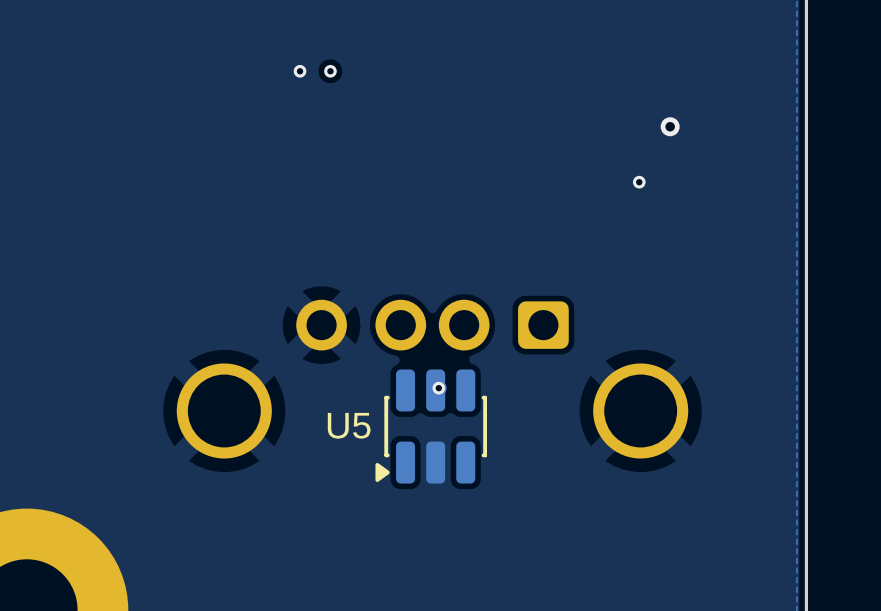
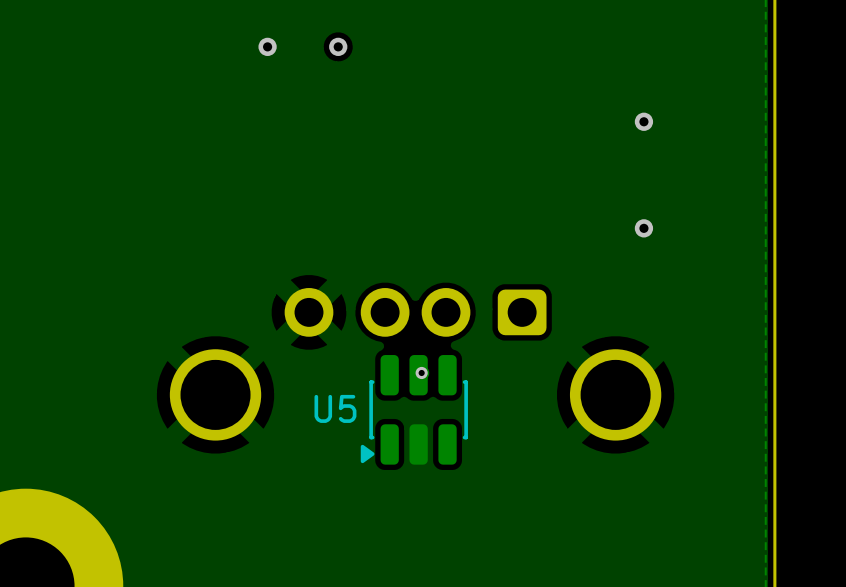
via: none -> (267, 46)
via: none -> (338, 46)
via: (300, 71) -> none
via: (330, 71) -> none
via: (639, 182) -> none
via: none -> (643, 228)

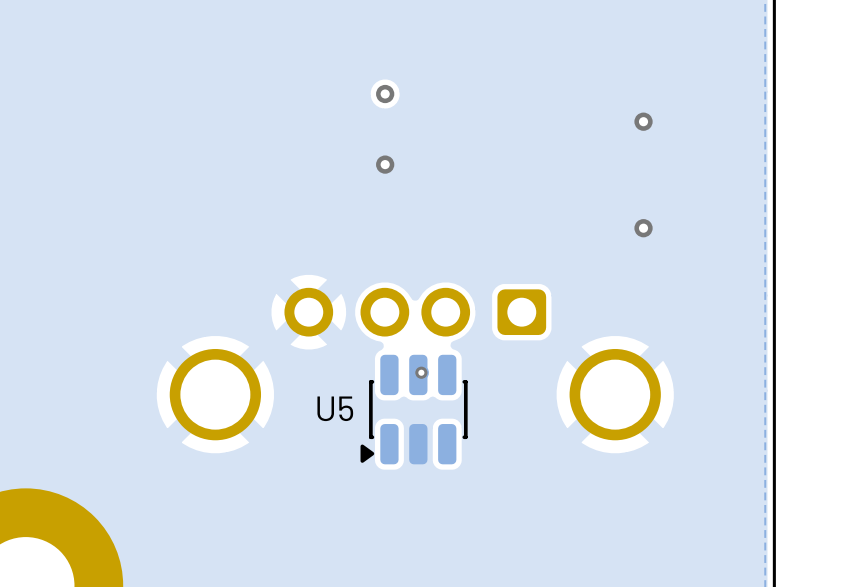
via: (267, 46) -> none
via: (338, 46) -> none
via: none -> (385, 94)
via: none -> (385, 164)

